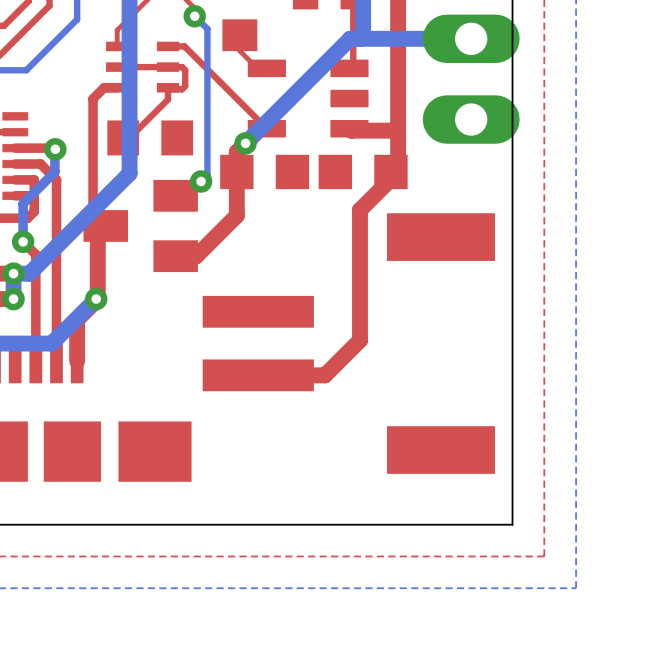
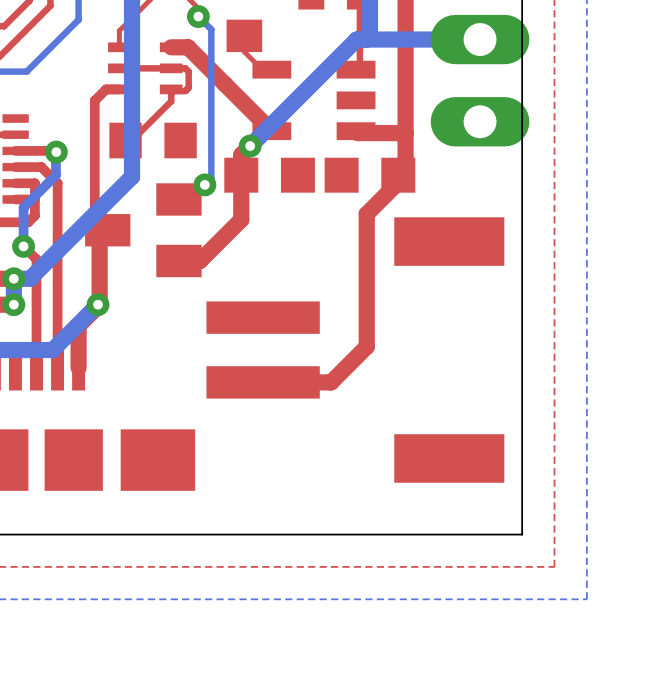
top track width: thin (168, 46) (184, 46) (266, 128) -> thick (171, 47) (188, 47) (271, 131)

